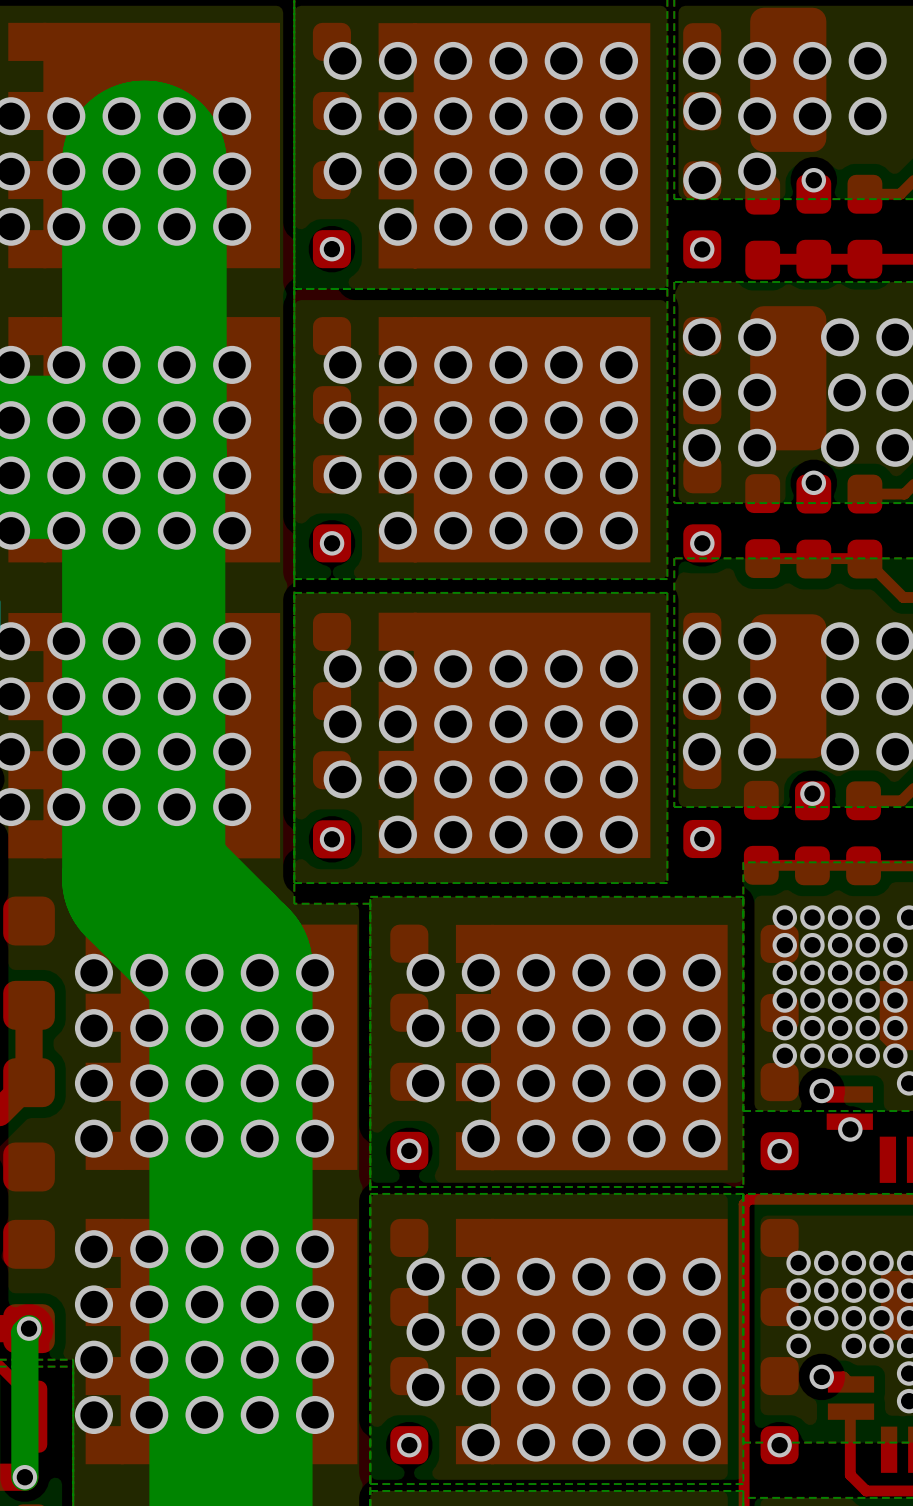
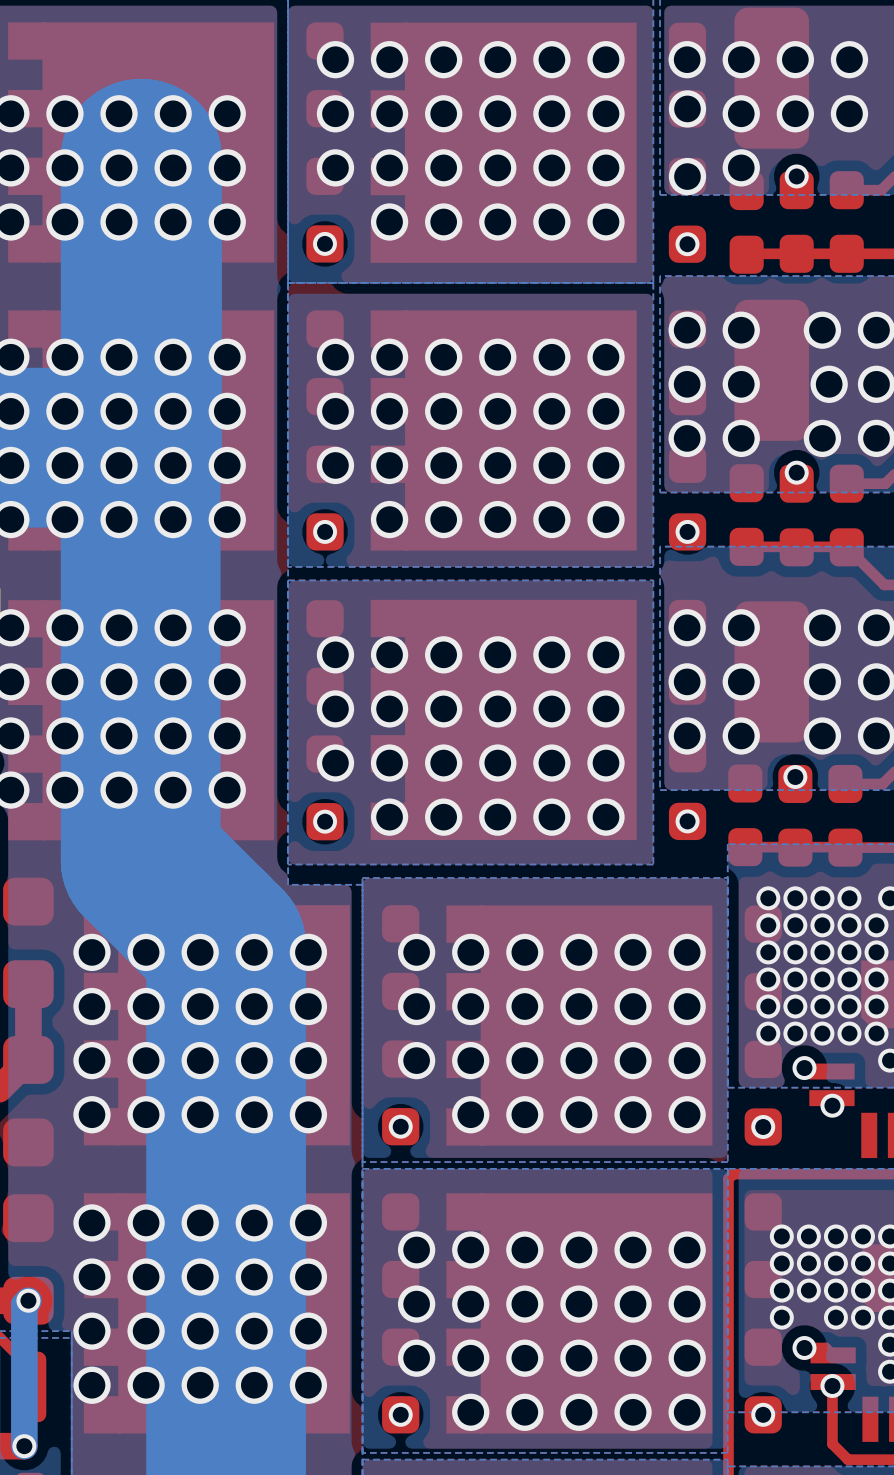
via: none -> (832, 1386)

